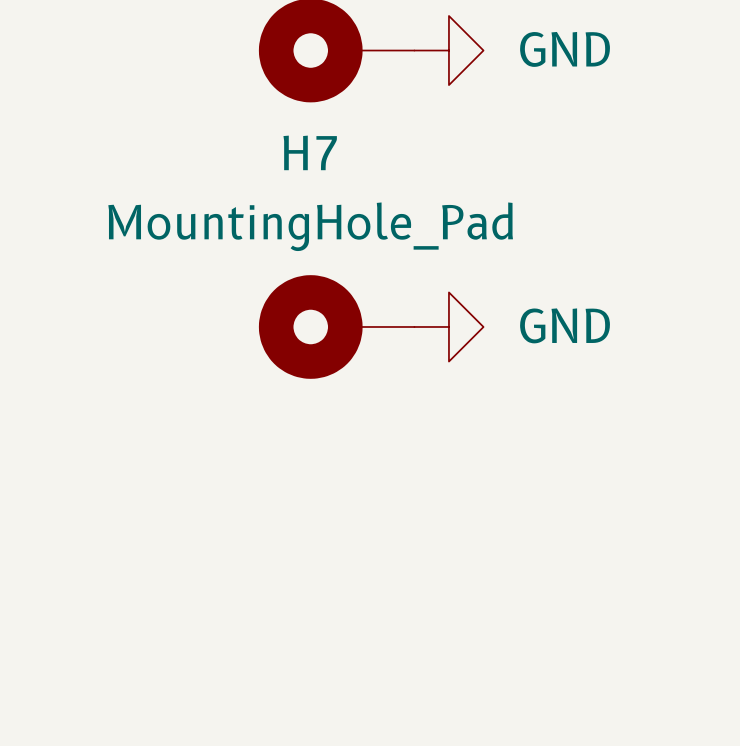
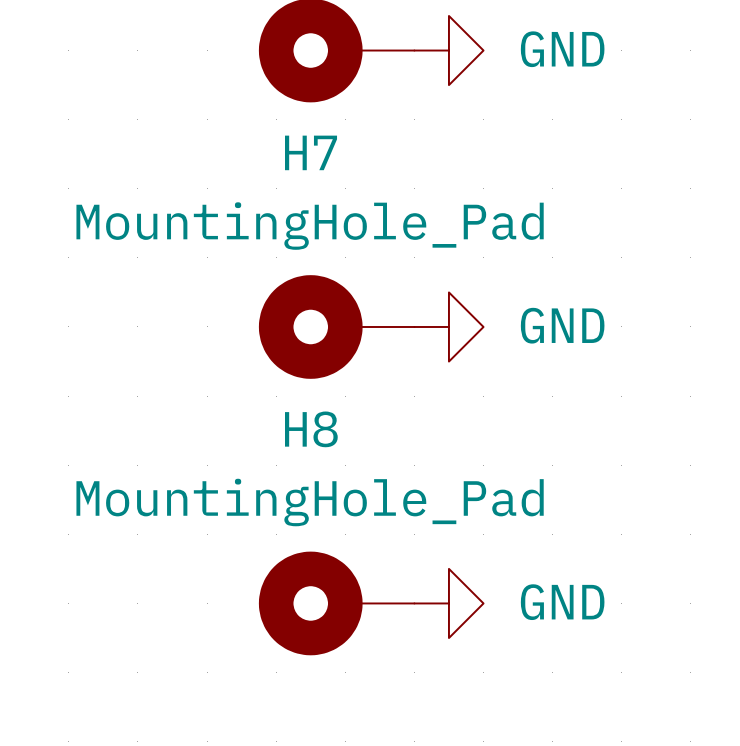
H8: none -> MountingHole_Pad (336, 603)
power symbol: none -> GND (448, 603)

